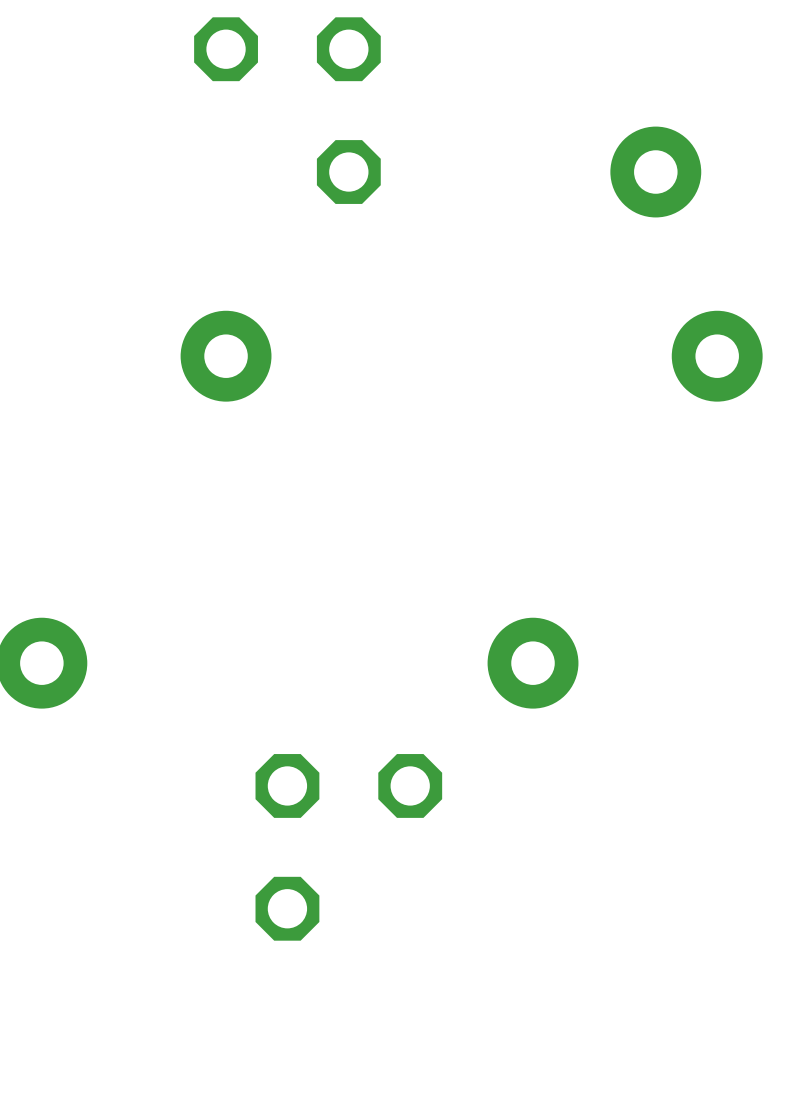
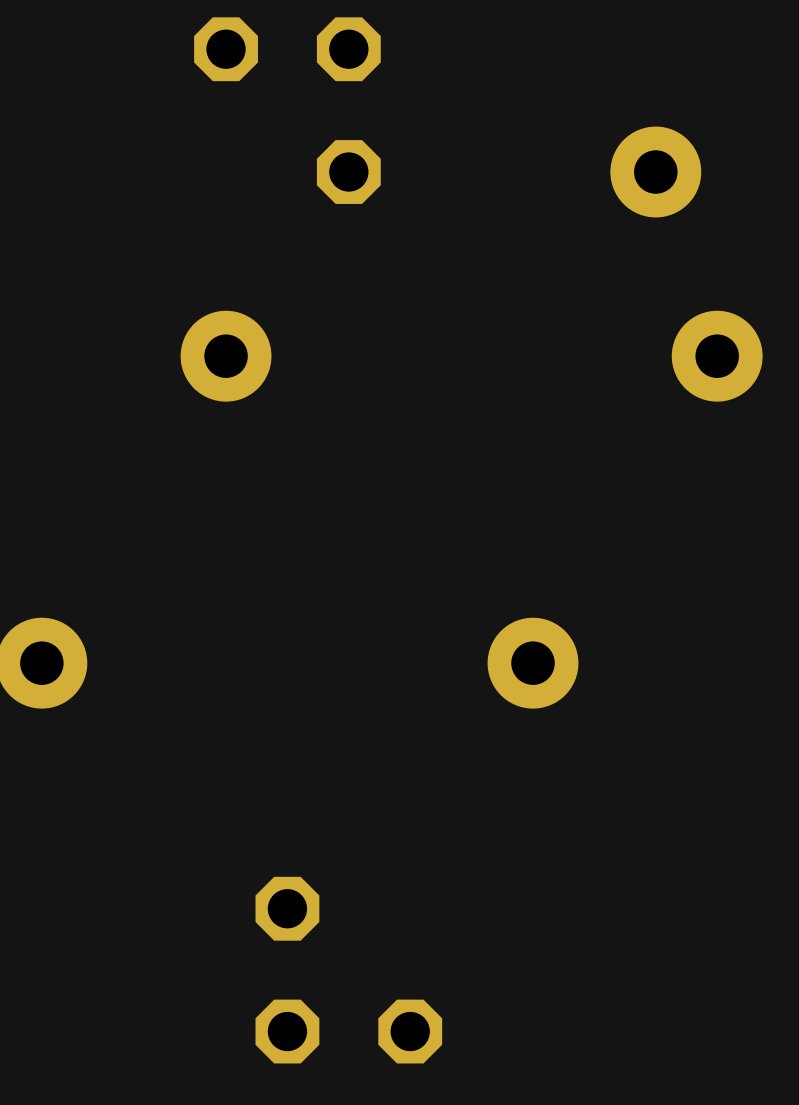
part rotation: 0° (348, 847) -> 90° counterclockwise (348, 970)
part position: (348, 847) -> (348, 970)

